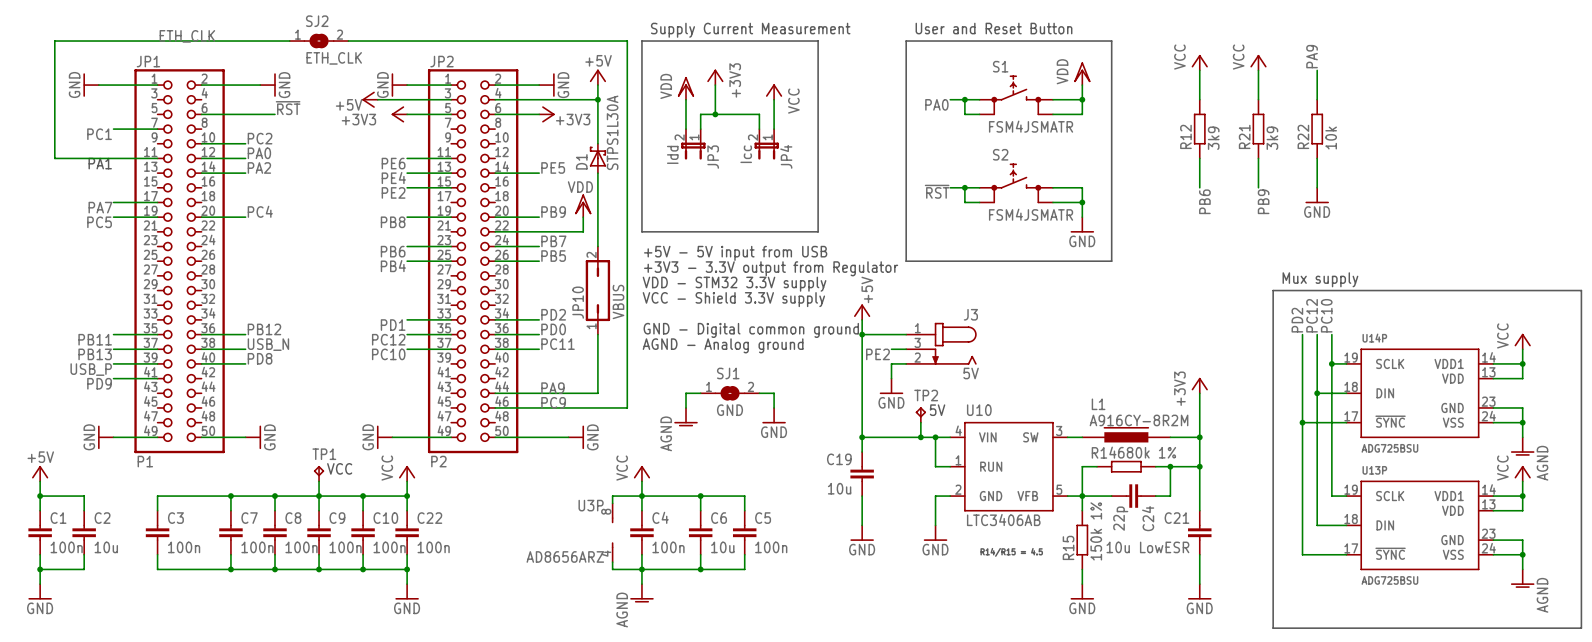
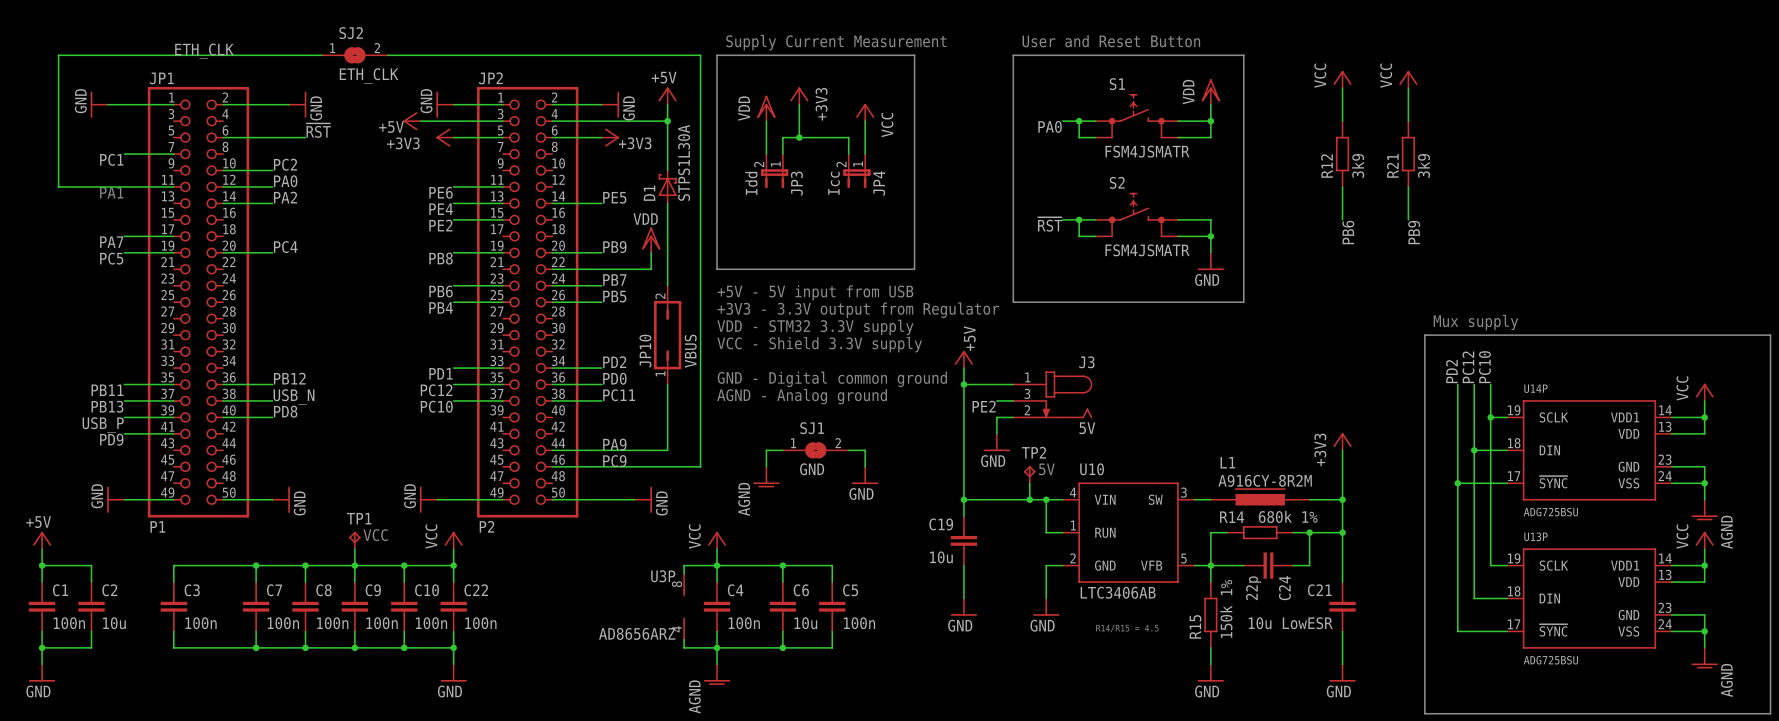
label: PA9 (1312, 56) -> none
wire: (1317, 70) (1317, 99) -> none
R22: 10k (1317, 129) -> none
wire: (1317, 158) (1317, 187) -> none
power symbol: GND (1317, 195) -> none

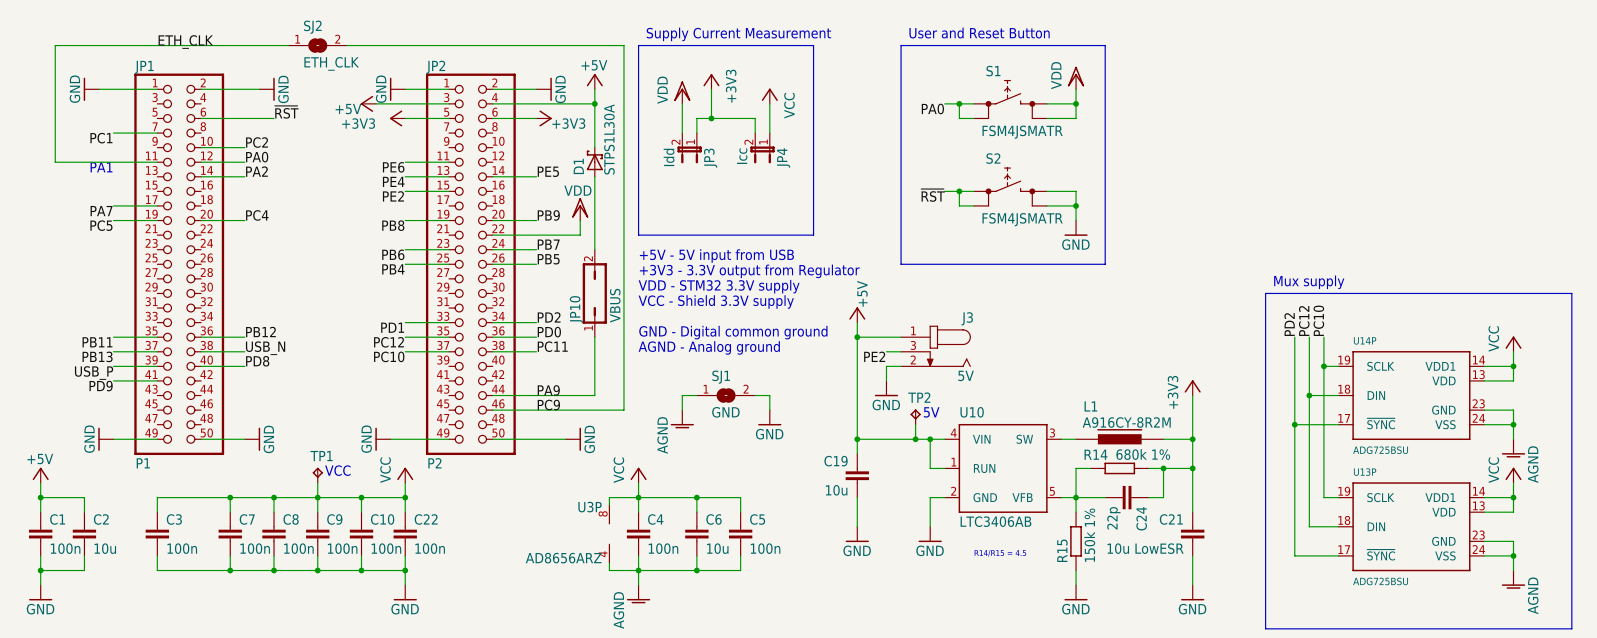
power symbol: VCC (1342, 79) -> none
power symbol: VCC (1408, 79) -> none
wire: (1342, 88) (1342, 121) -> none
wire: (1408, 88) (1408, 121) -> none
R12: 3k9 (1342, 154) -> none
R21: 3k9 (1408, 154) -> none
wire: (1342, 186) (1342, 219) -> none
wire: (1408, 186) (1408, 219) -> none
label: PB6 (1348, 232) -> none
label: PB9 (1414, 232) -> none

